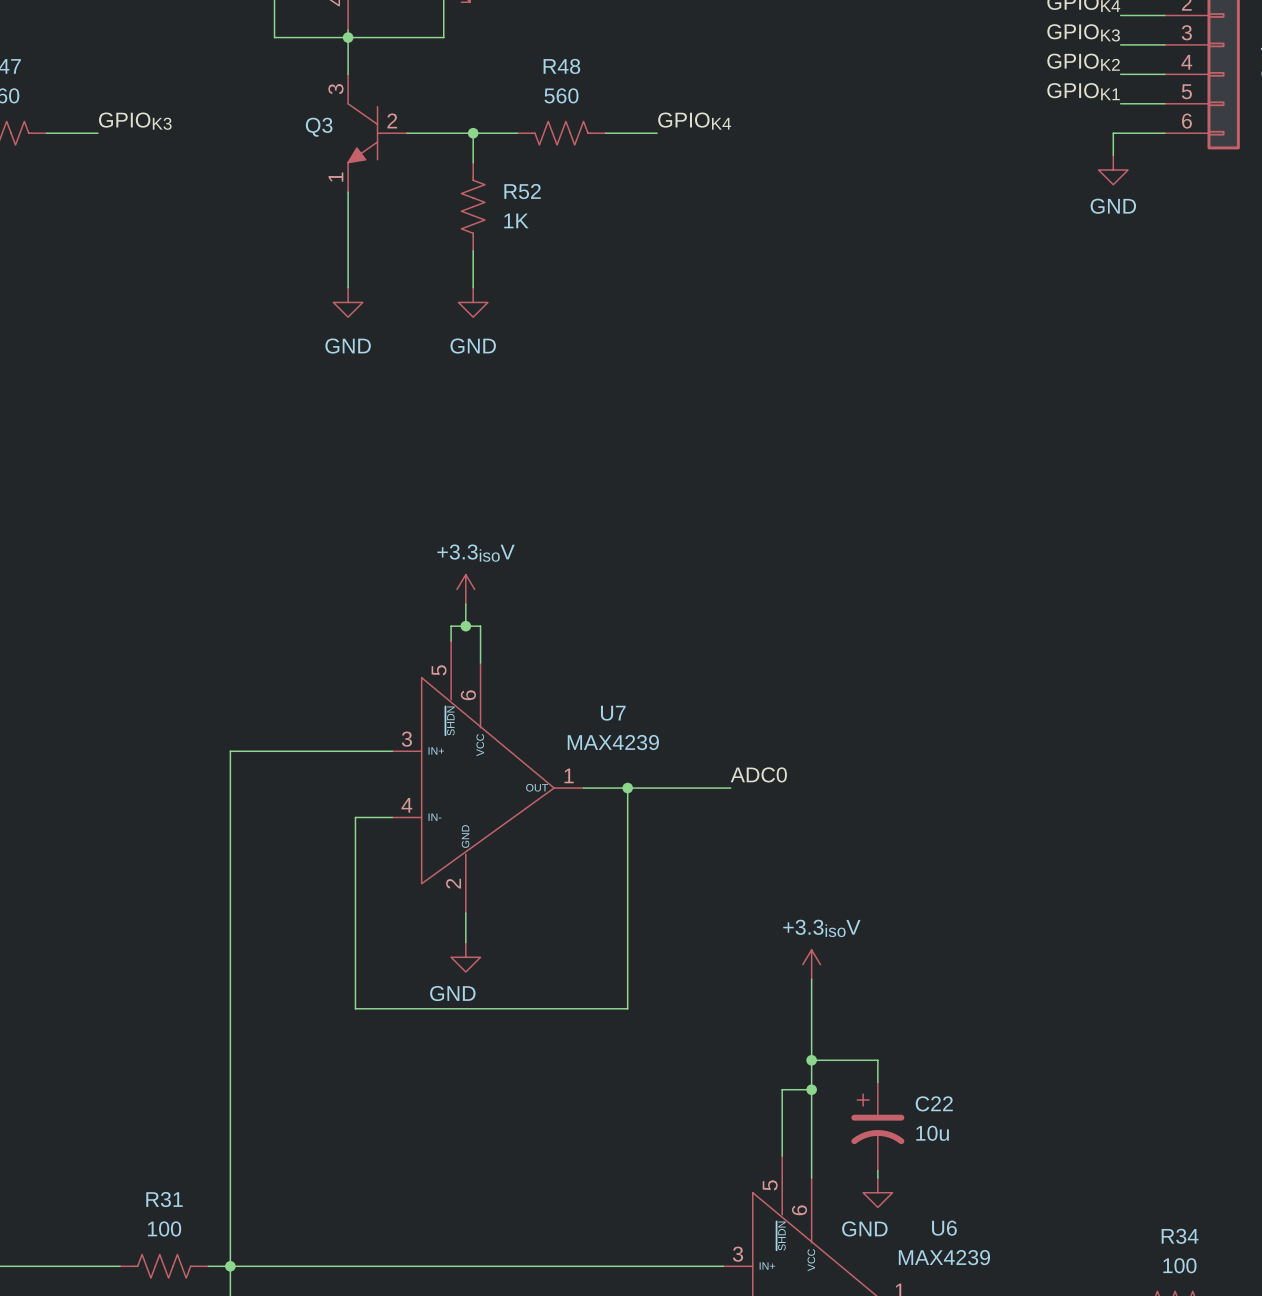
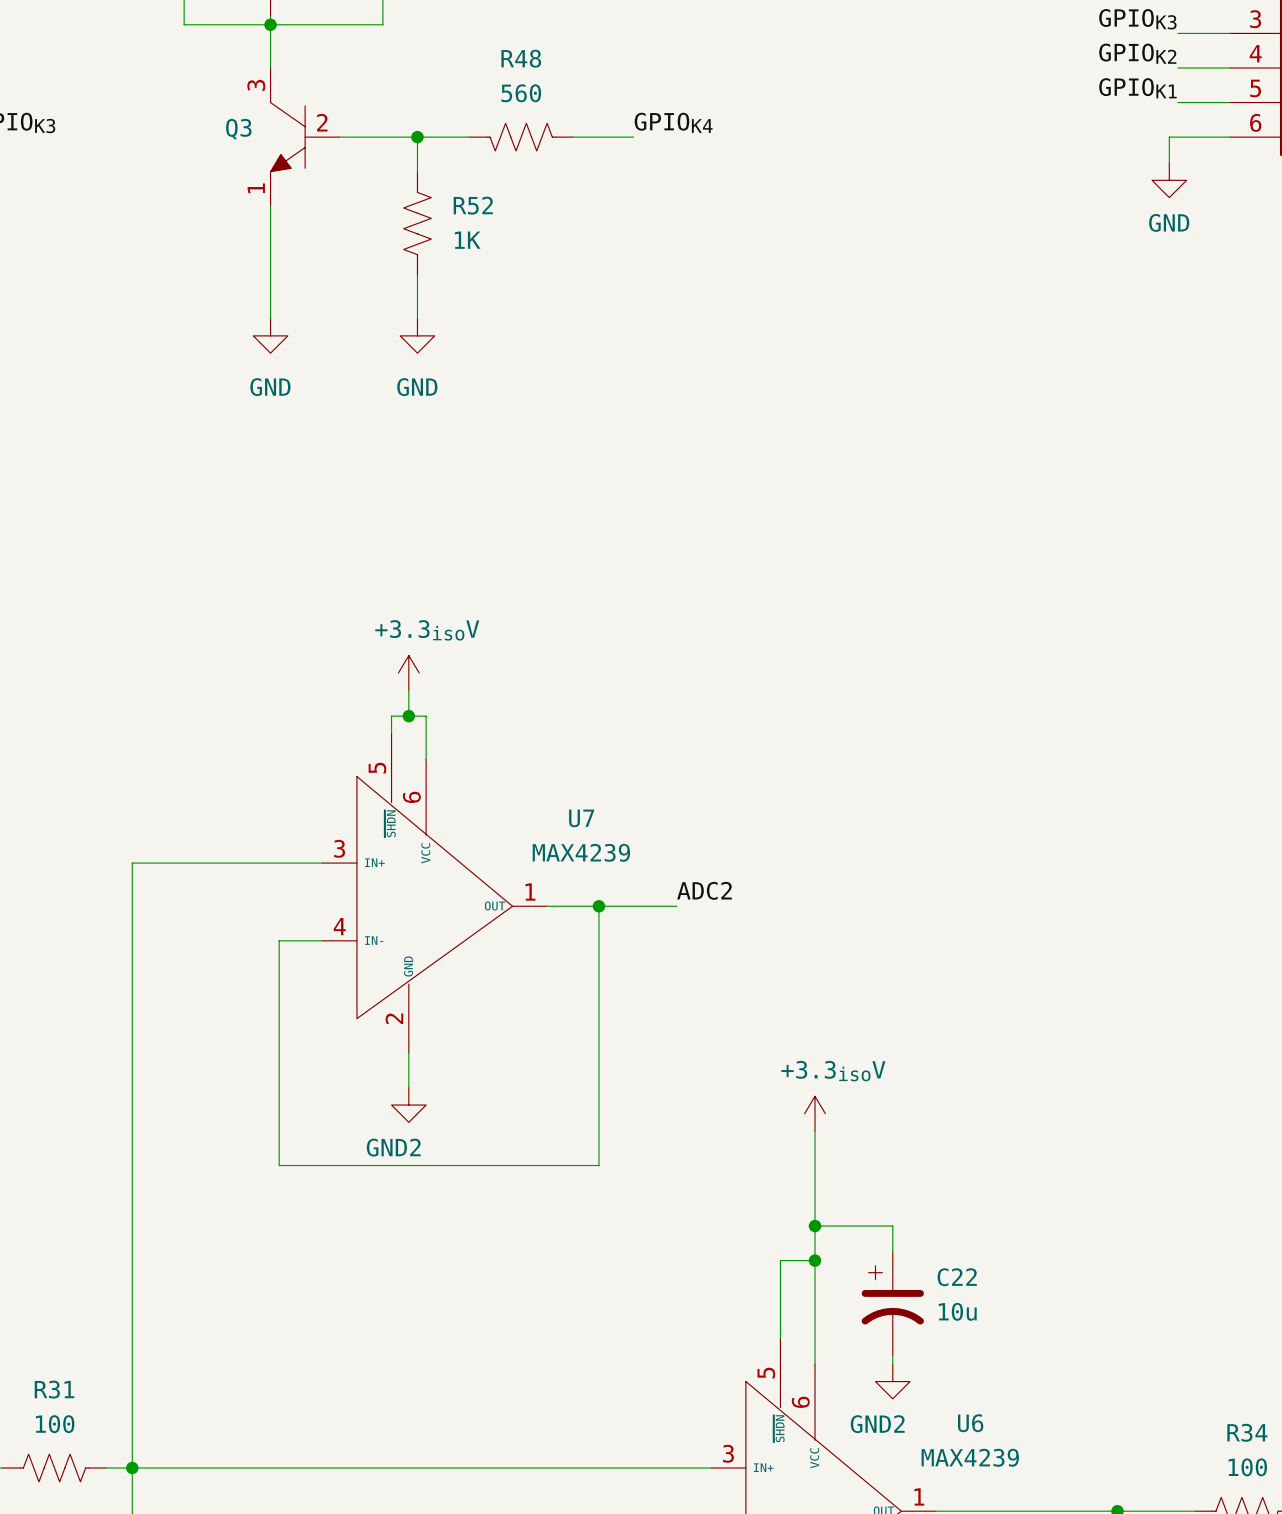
label: ADC0 (758, 774) -> ADC2 (704, 890)
wire: (693, 788) (730, 788) -> none
power symbol: GND (465, 957) -> GND2 (408, 1105)
power symbol: GND (877, 1192) -> GND2 (892, 1381)

